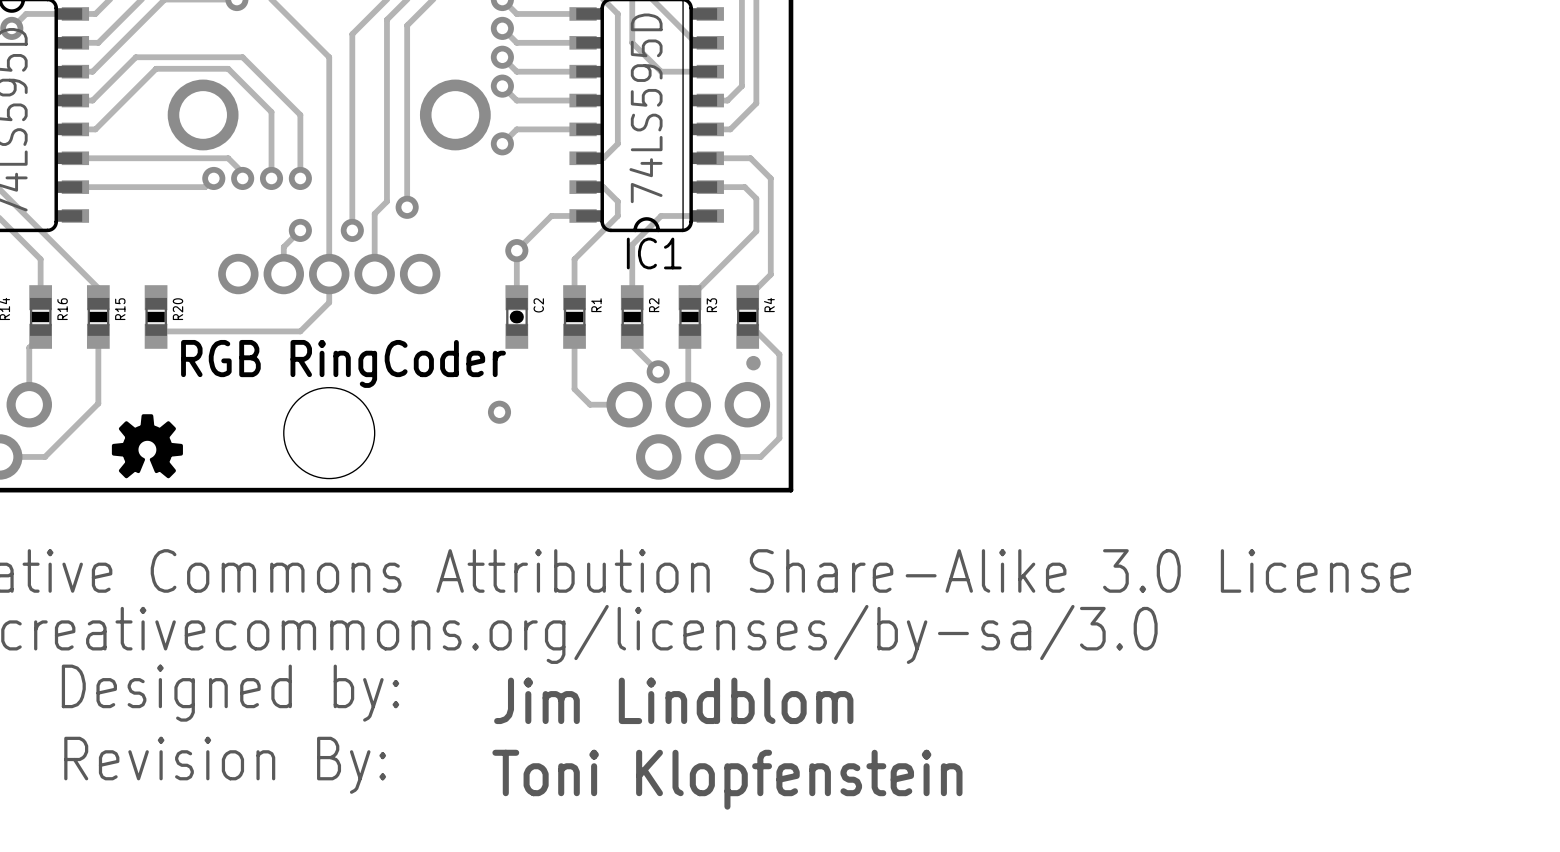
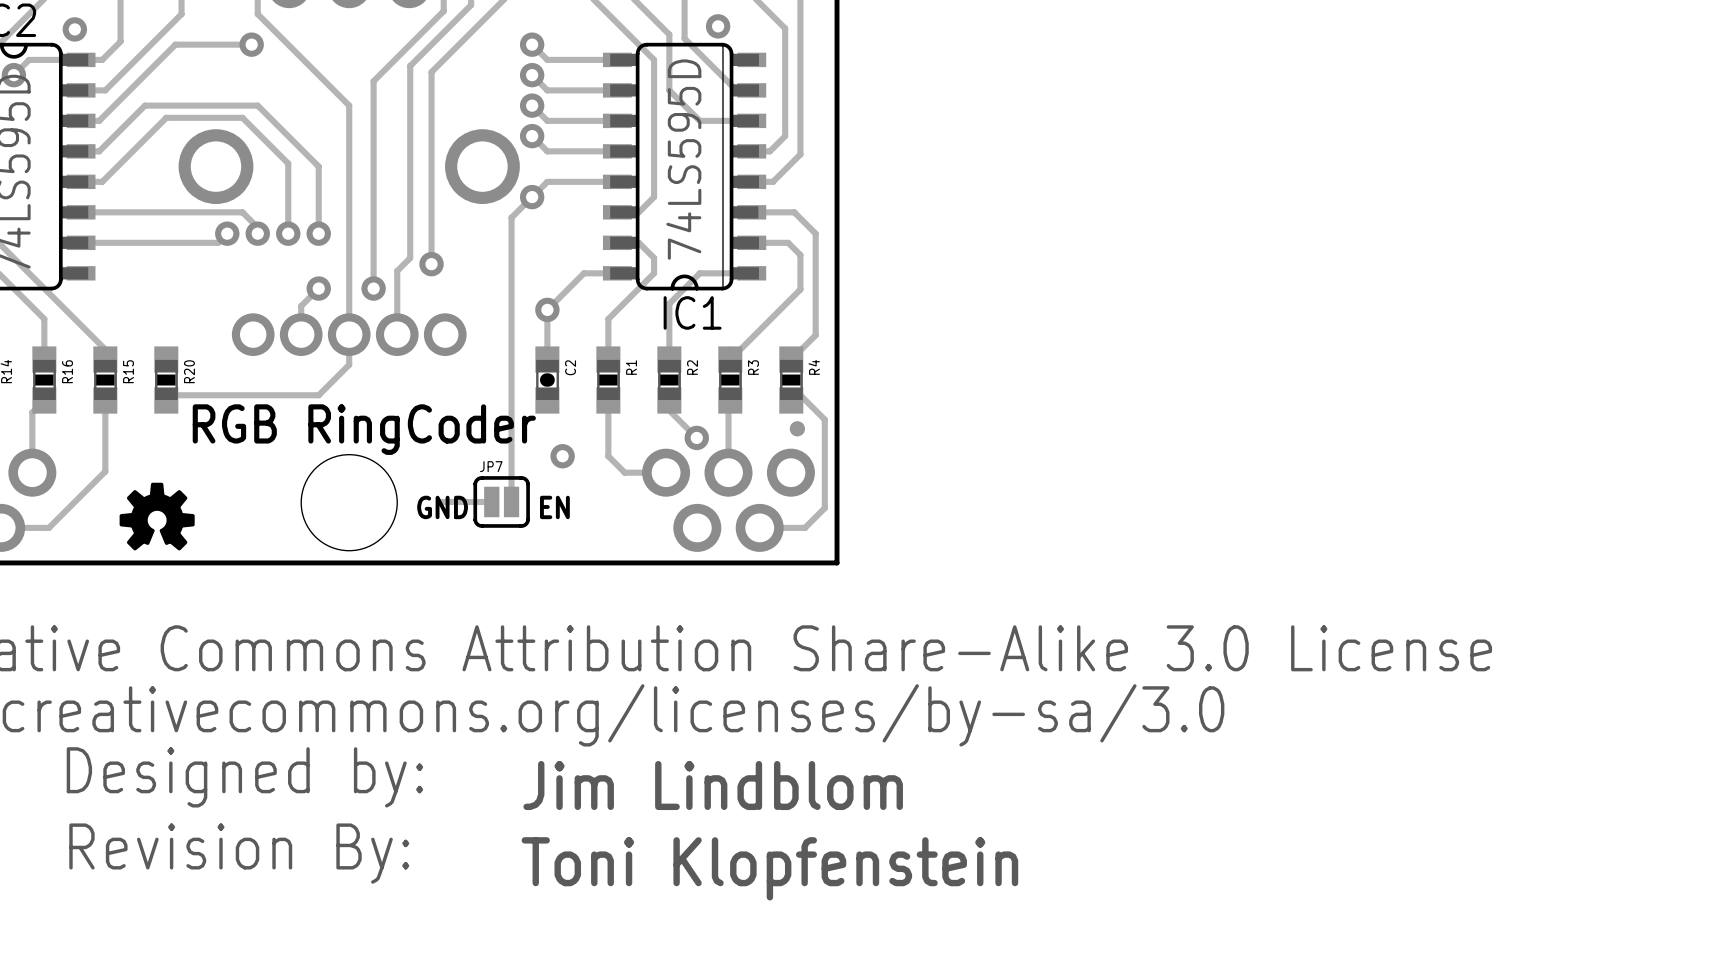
track: none -> (532, 197) (511, 217) (511, 501)
via position: (499, 412) -> (562, 456)
track: none -> (440, 501) (491, 501)
JP7: none -> (501, 501)
text: none -> GND (442, 507)
text: none -> EN (554, 507)

